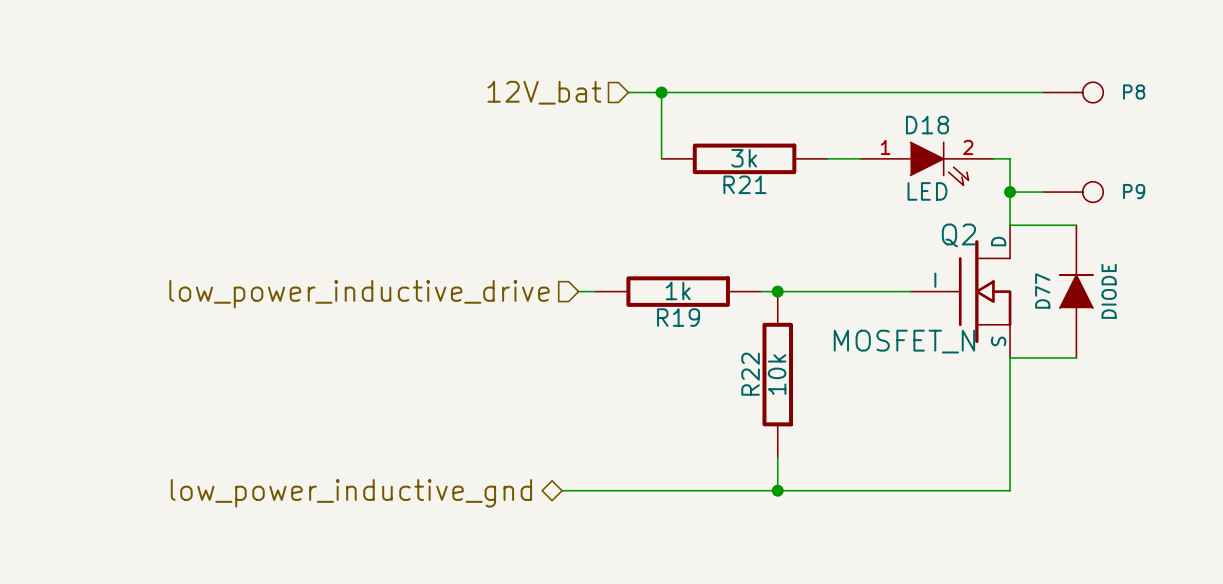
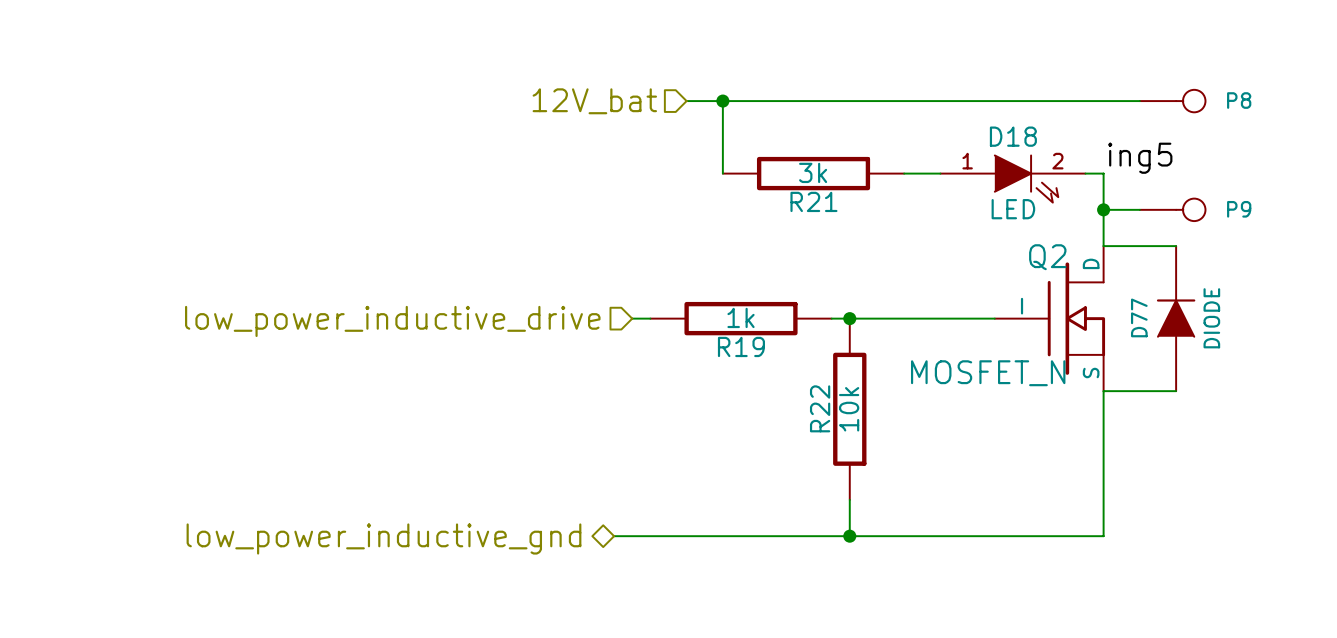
label: none -> ing5 (1140, 158)

